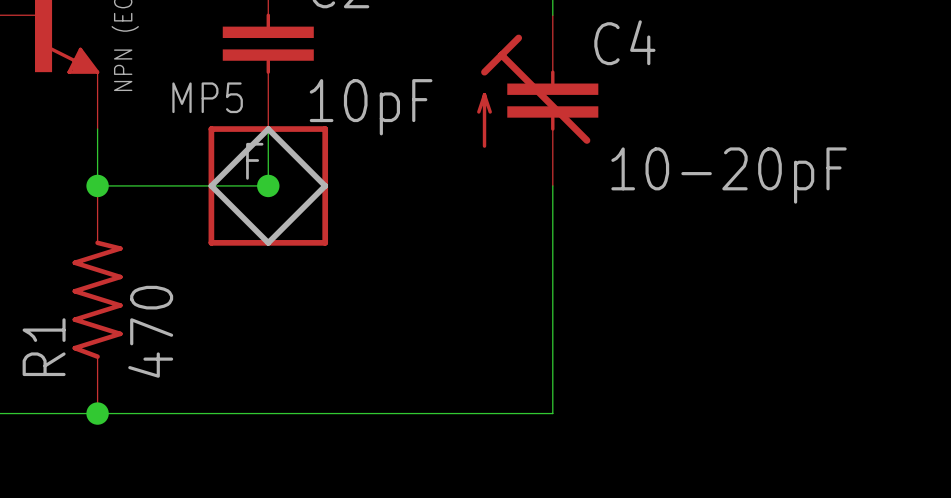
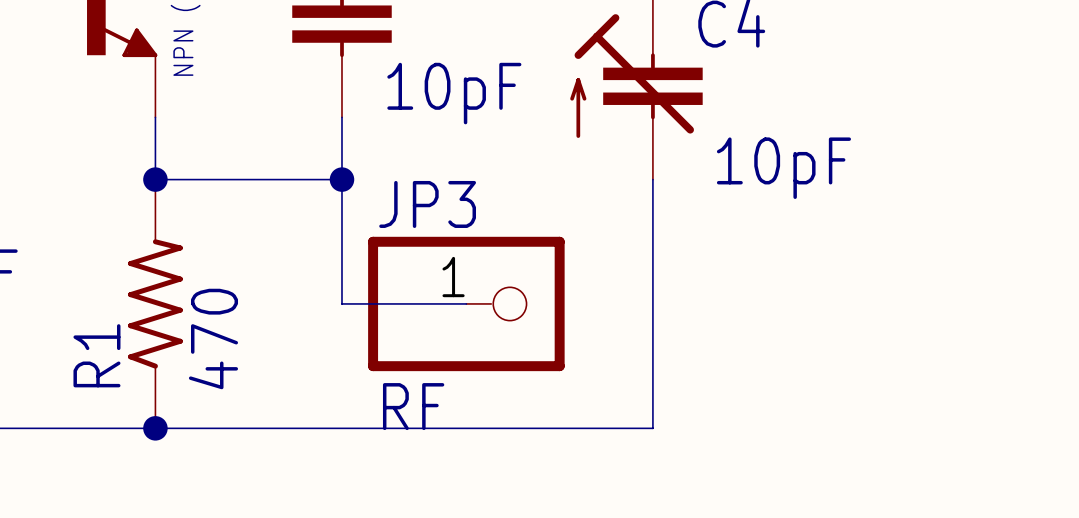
C4 value: 10-20pF (729, 175) -> 10pF (783, 168)
wire: none -> (341, 179) (341, 303) (466, 303)
MP5: (268, 185) -> none
JP3: none -> RF (466, 303)

